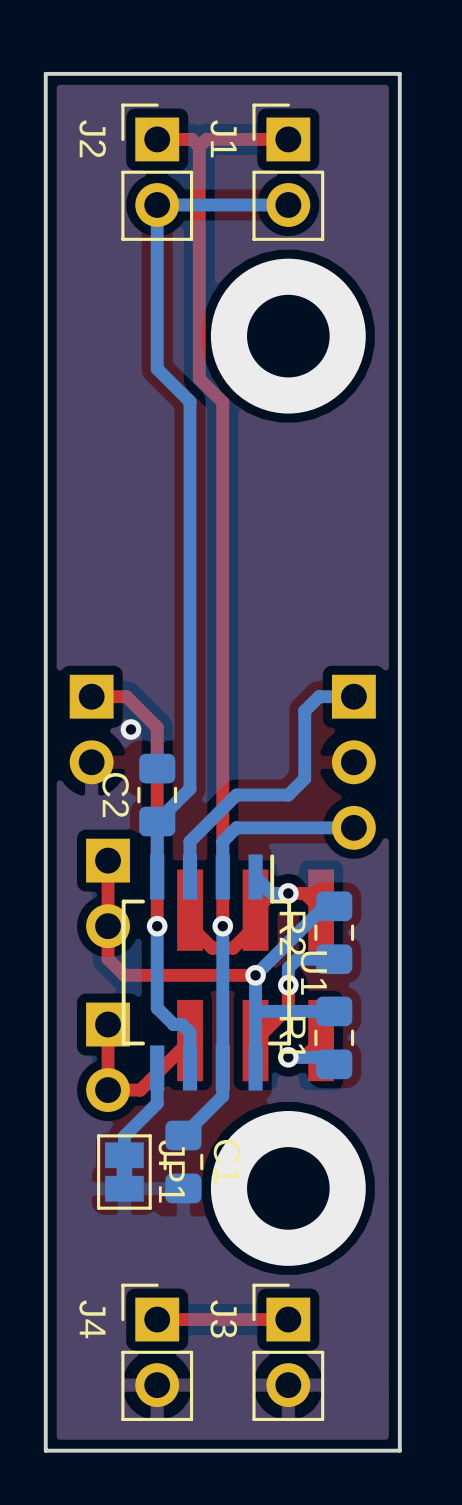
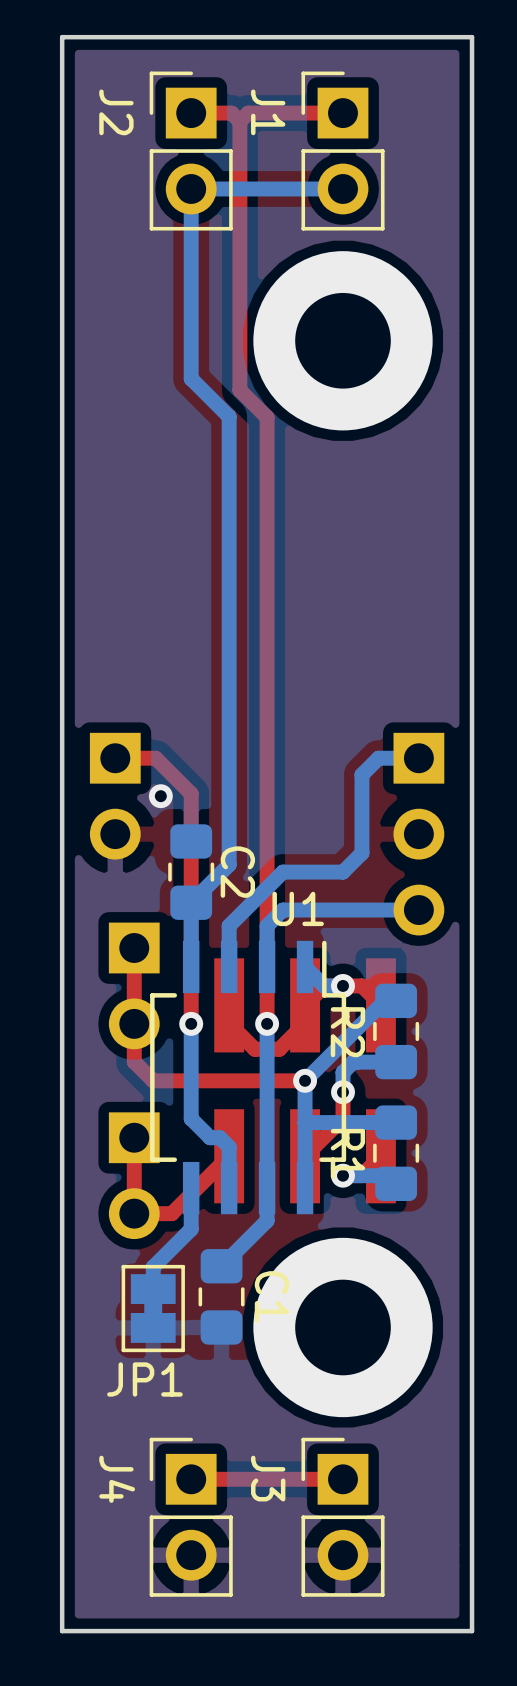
C2 name position: C2 (115, 795) -> C2 (237, 872)
U1 name rotation: 0° (313, 973) -> 90° counterclockwise (298, 908)
U1 name position: U1 (313, 973) -> U1 (298, 908)
JP1 name rotation: 0° (171, 1171) -> 90° counterclockwise (144, 1379)

